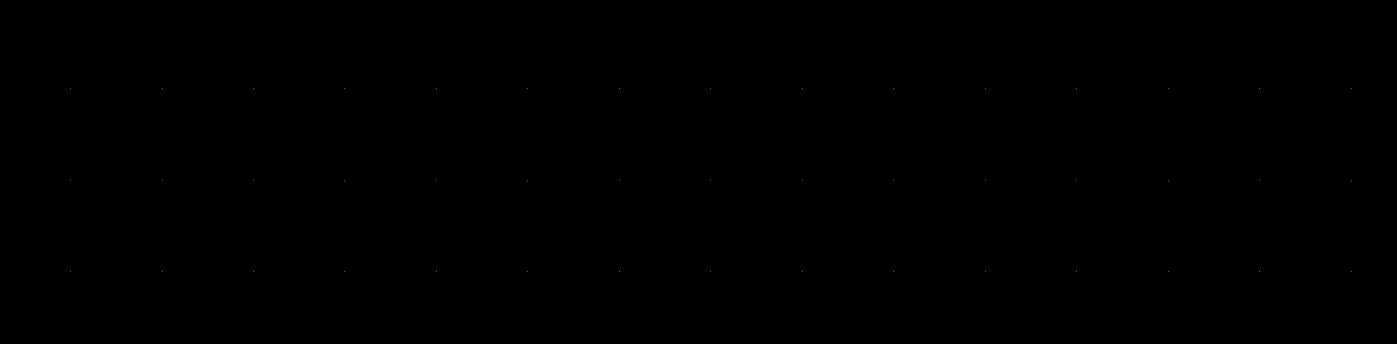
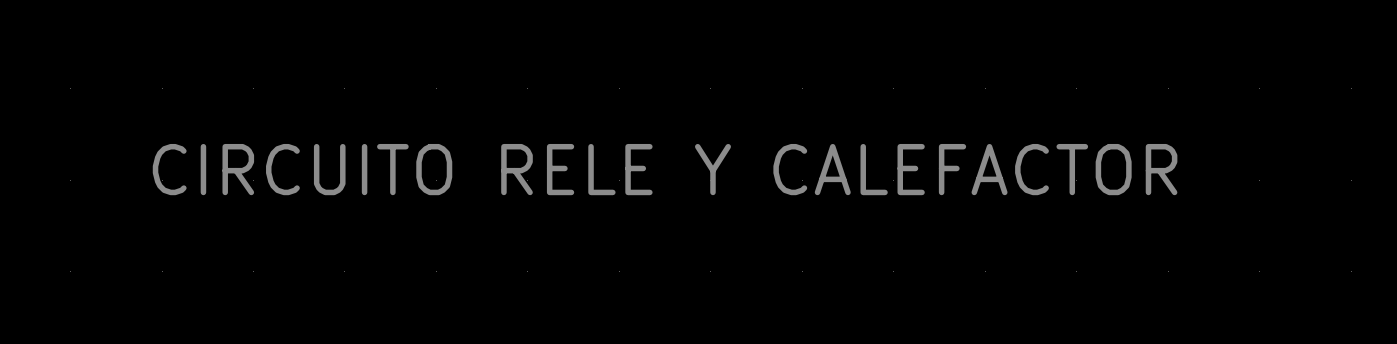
text: none -> CIRCUITO RELE Y CALEFACTOR (665, 169)

